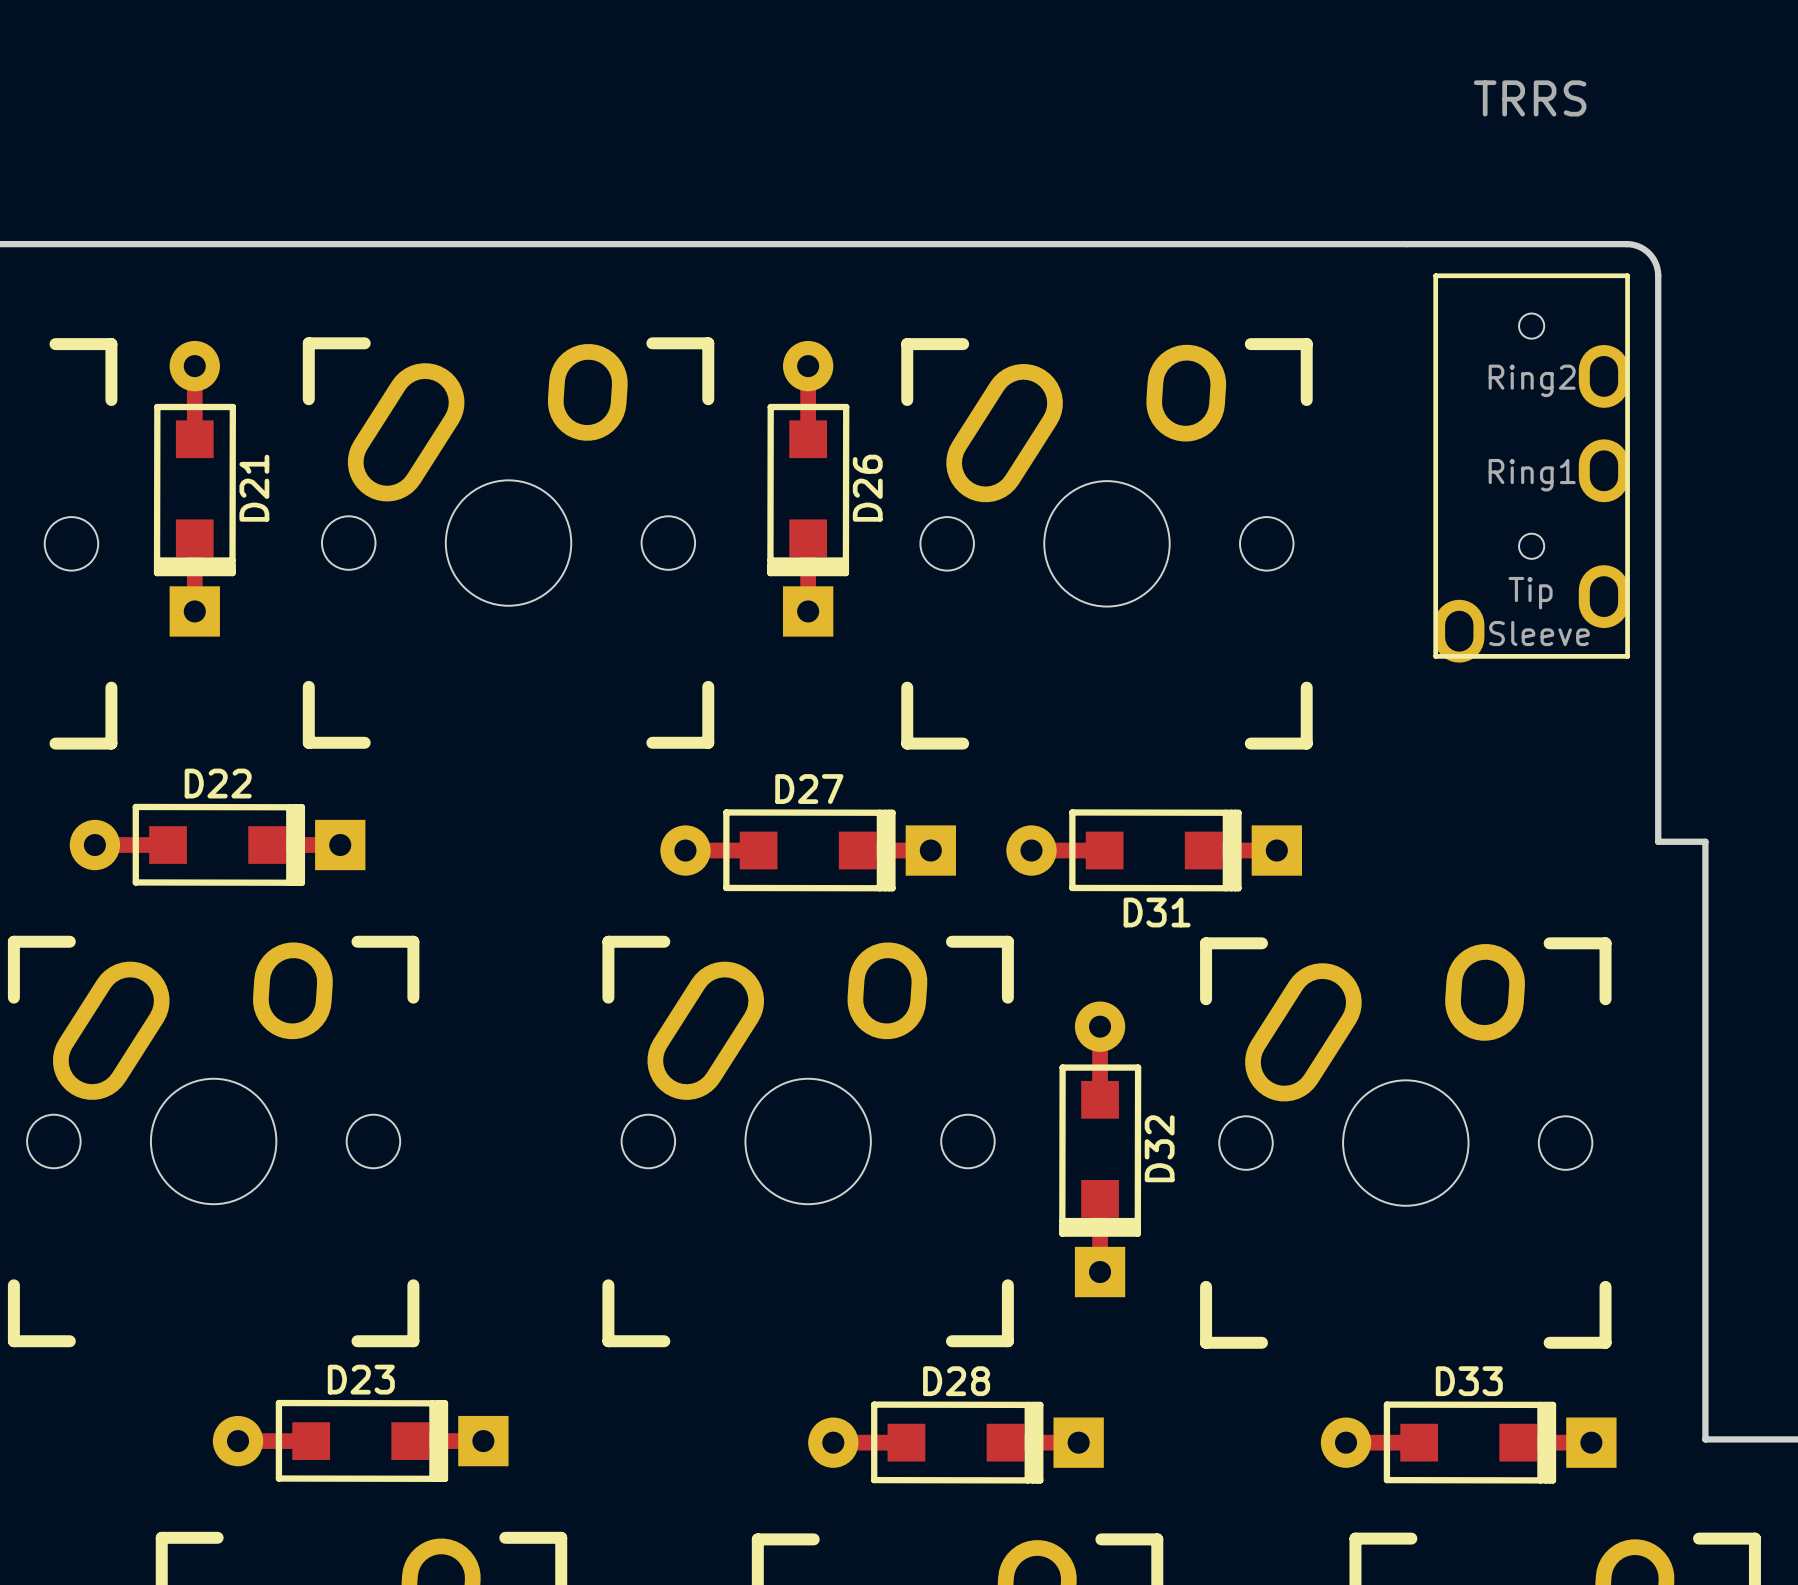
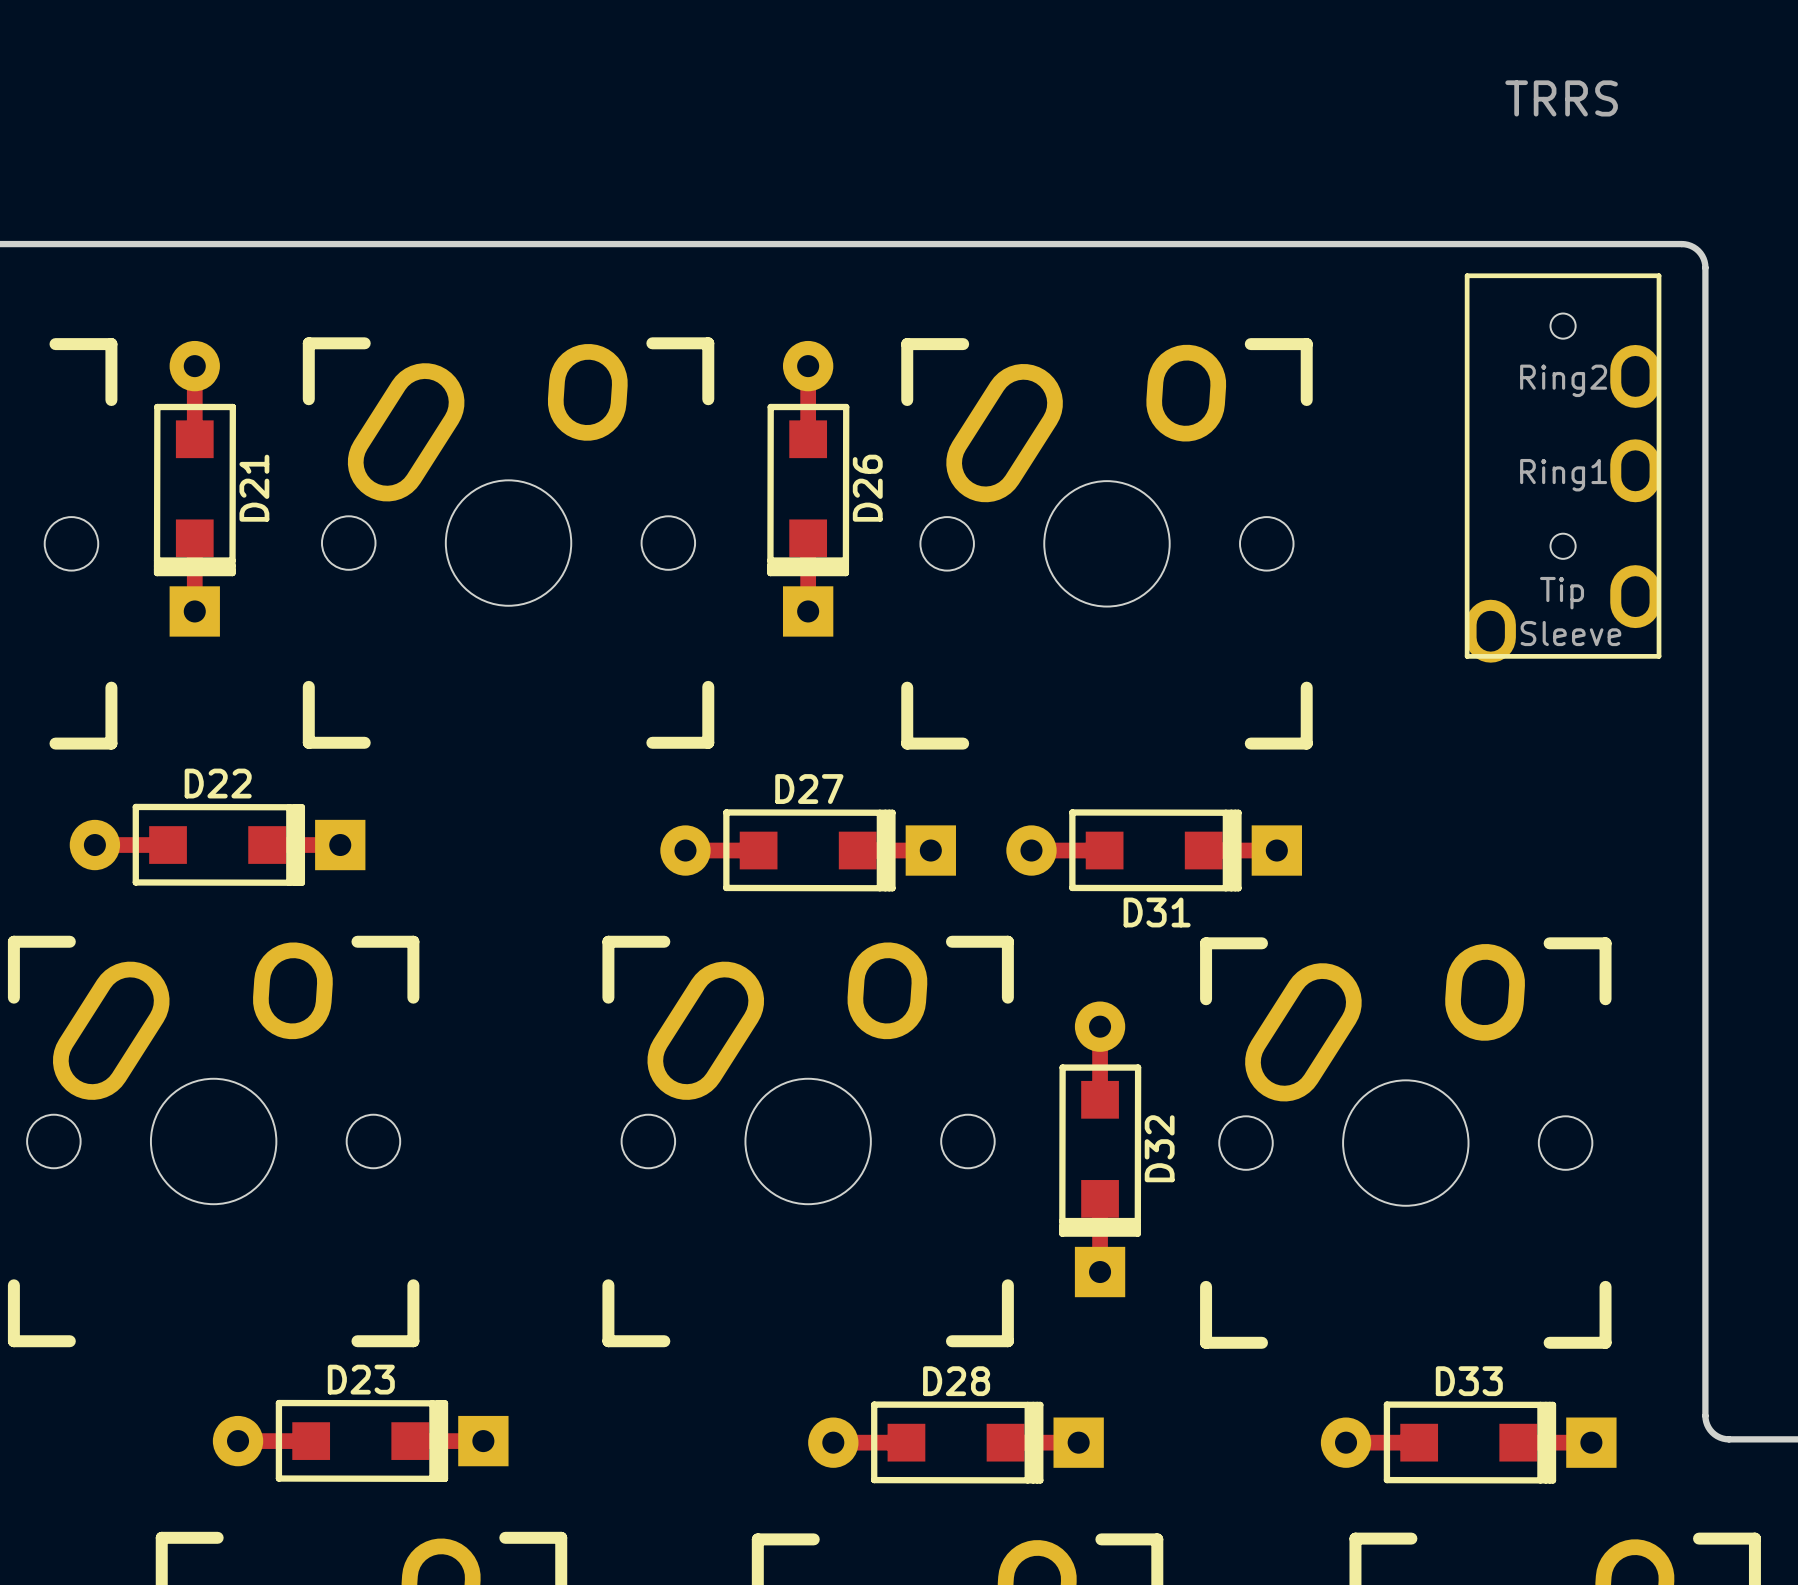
board edge: (1626, 244) (1640, 247) (1649, 253) (1655, 261) (1658, 272) (1658, 841) (1705, 841) (1705, 1439) (1729, 1439) -> (1626, 244) (1687, 244) (1700, 253) (1705, 264) (1705, 1415) (1707, 1424) (1712, 1432) (1719, 1437) (1729, 1439)
part position: (1531, 468) -> (1563, 468)

